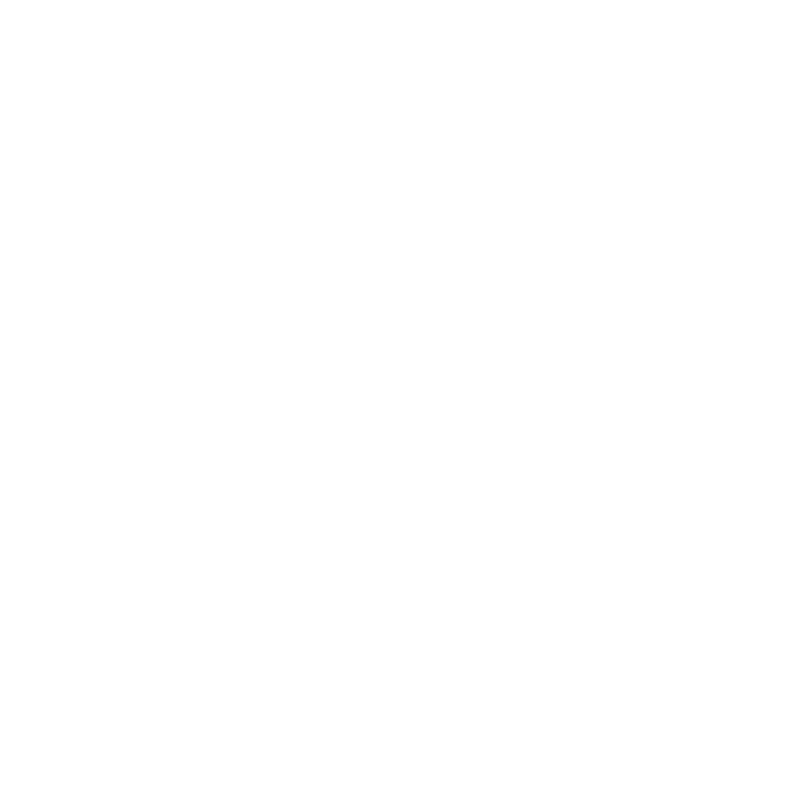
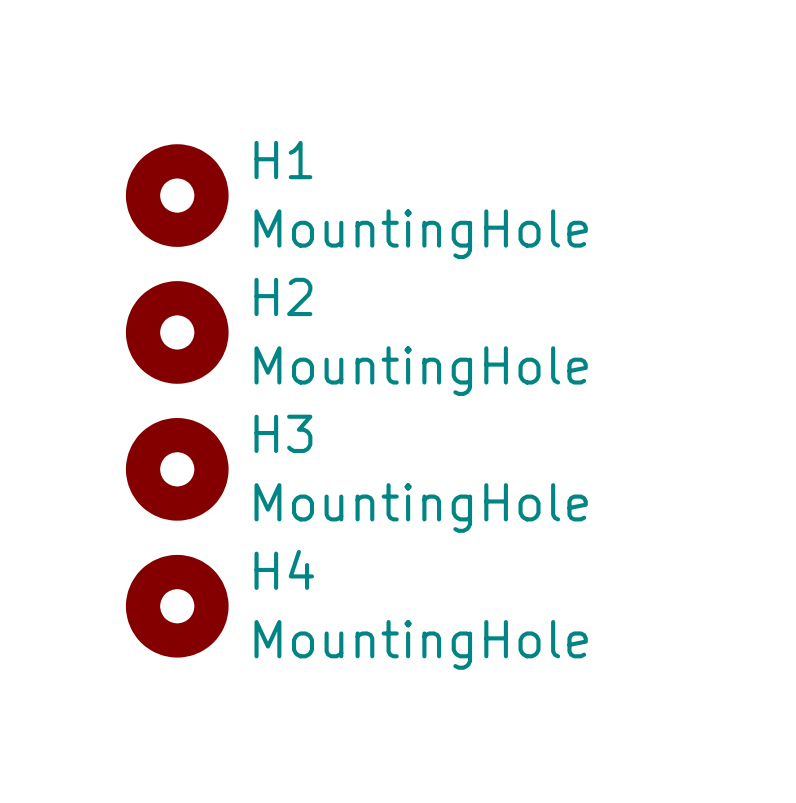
H1: none -> MountingHole (177, 195)
H2: none -> MountingHole (177, 332)
H3: none -> MountingHole (177, 469)
H4: none -> MountingHole (177, 606)

